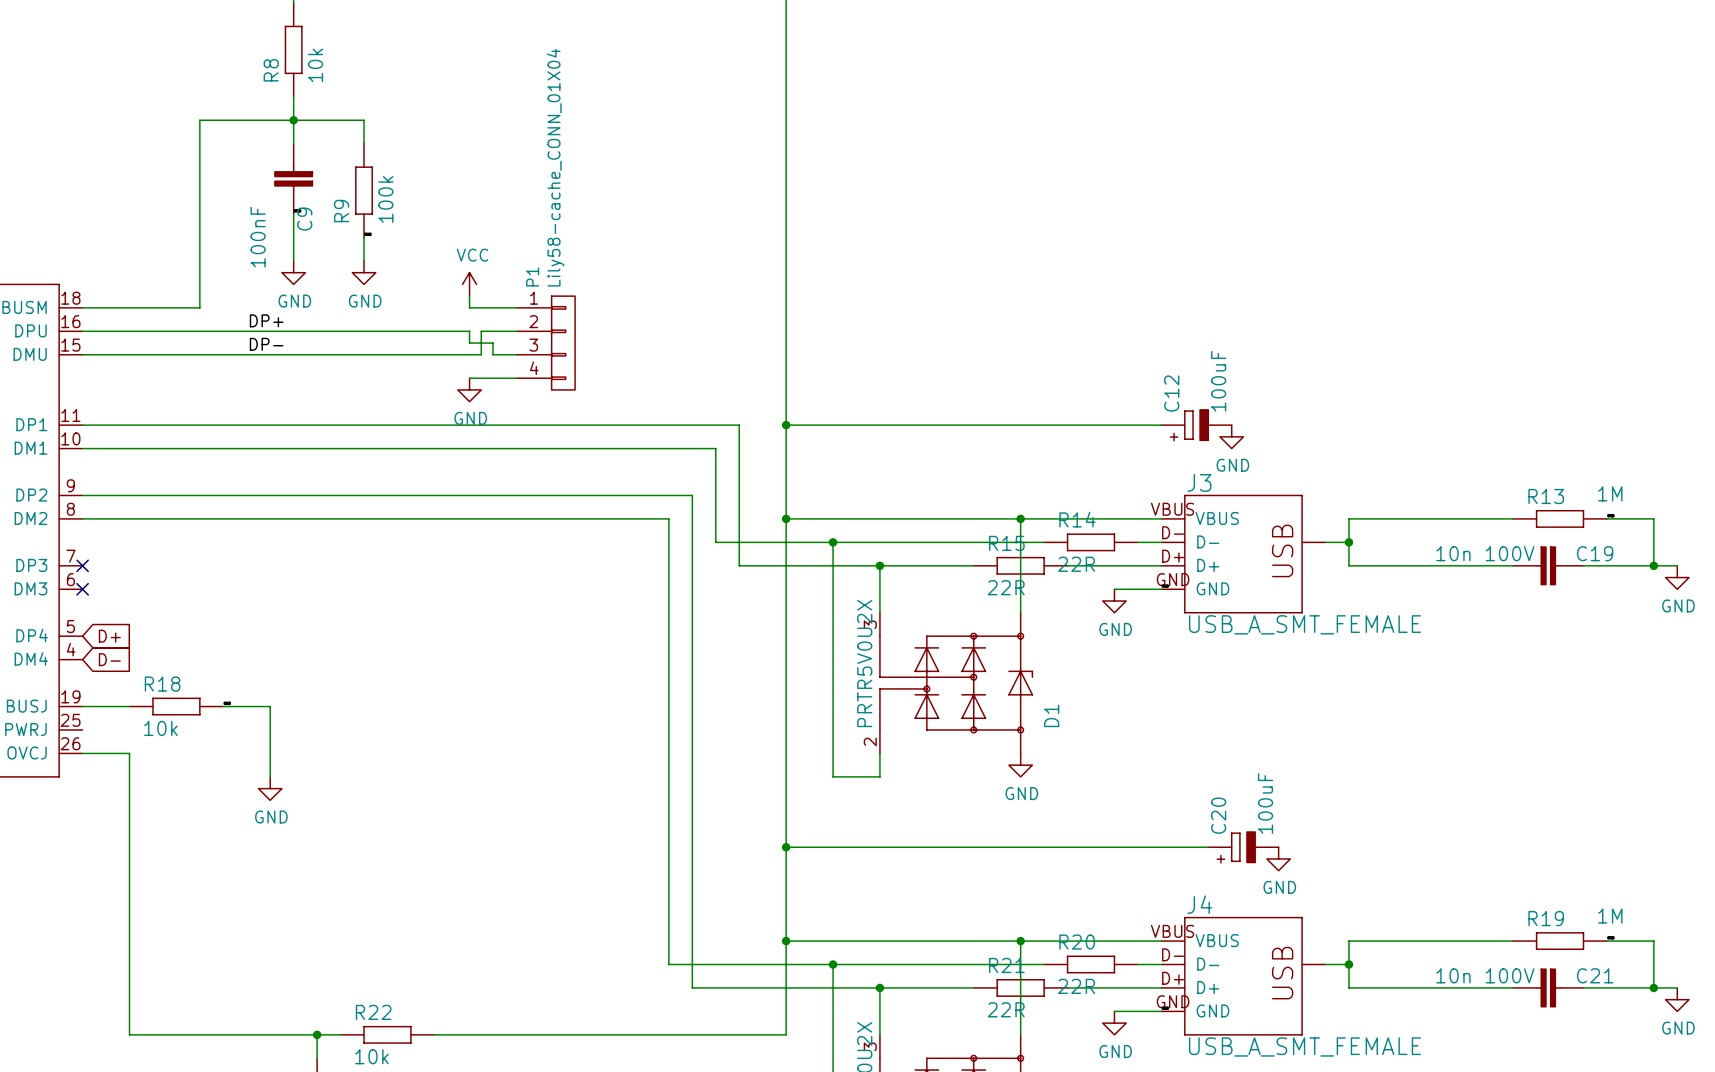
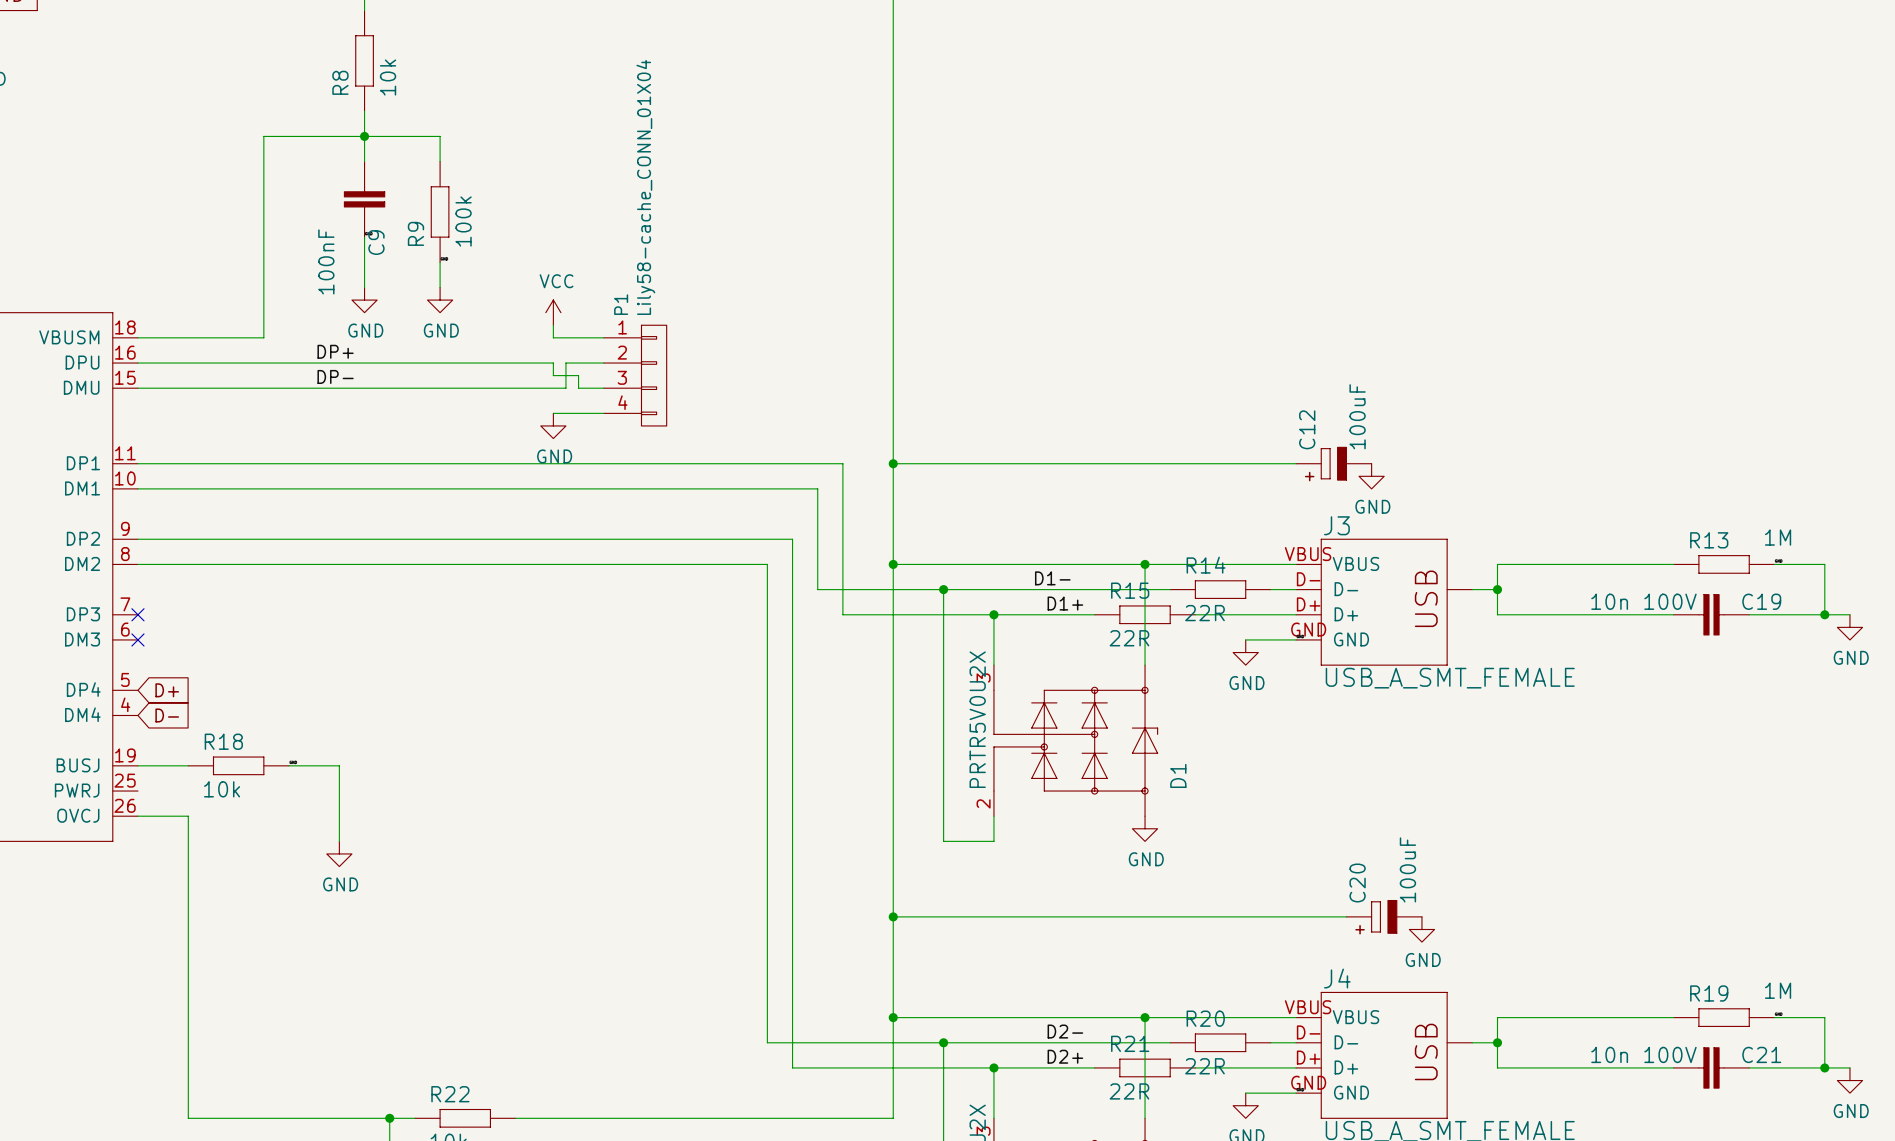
label: none -> D1- (1052, 578)
label: none -> D1+ (1065, 603)
label: none -> D2- (1065, 1031)
label: none -> D2+ (1065, 1056)

